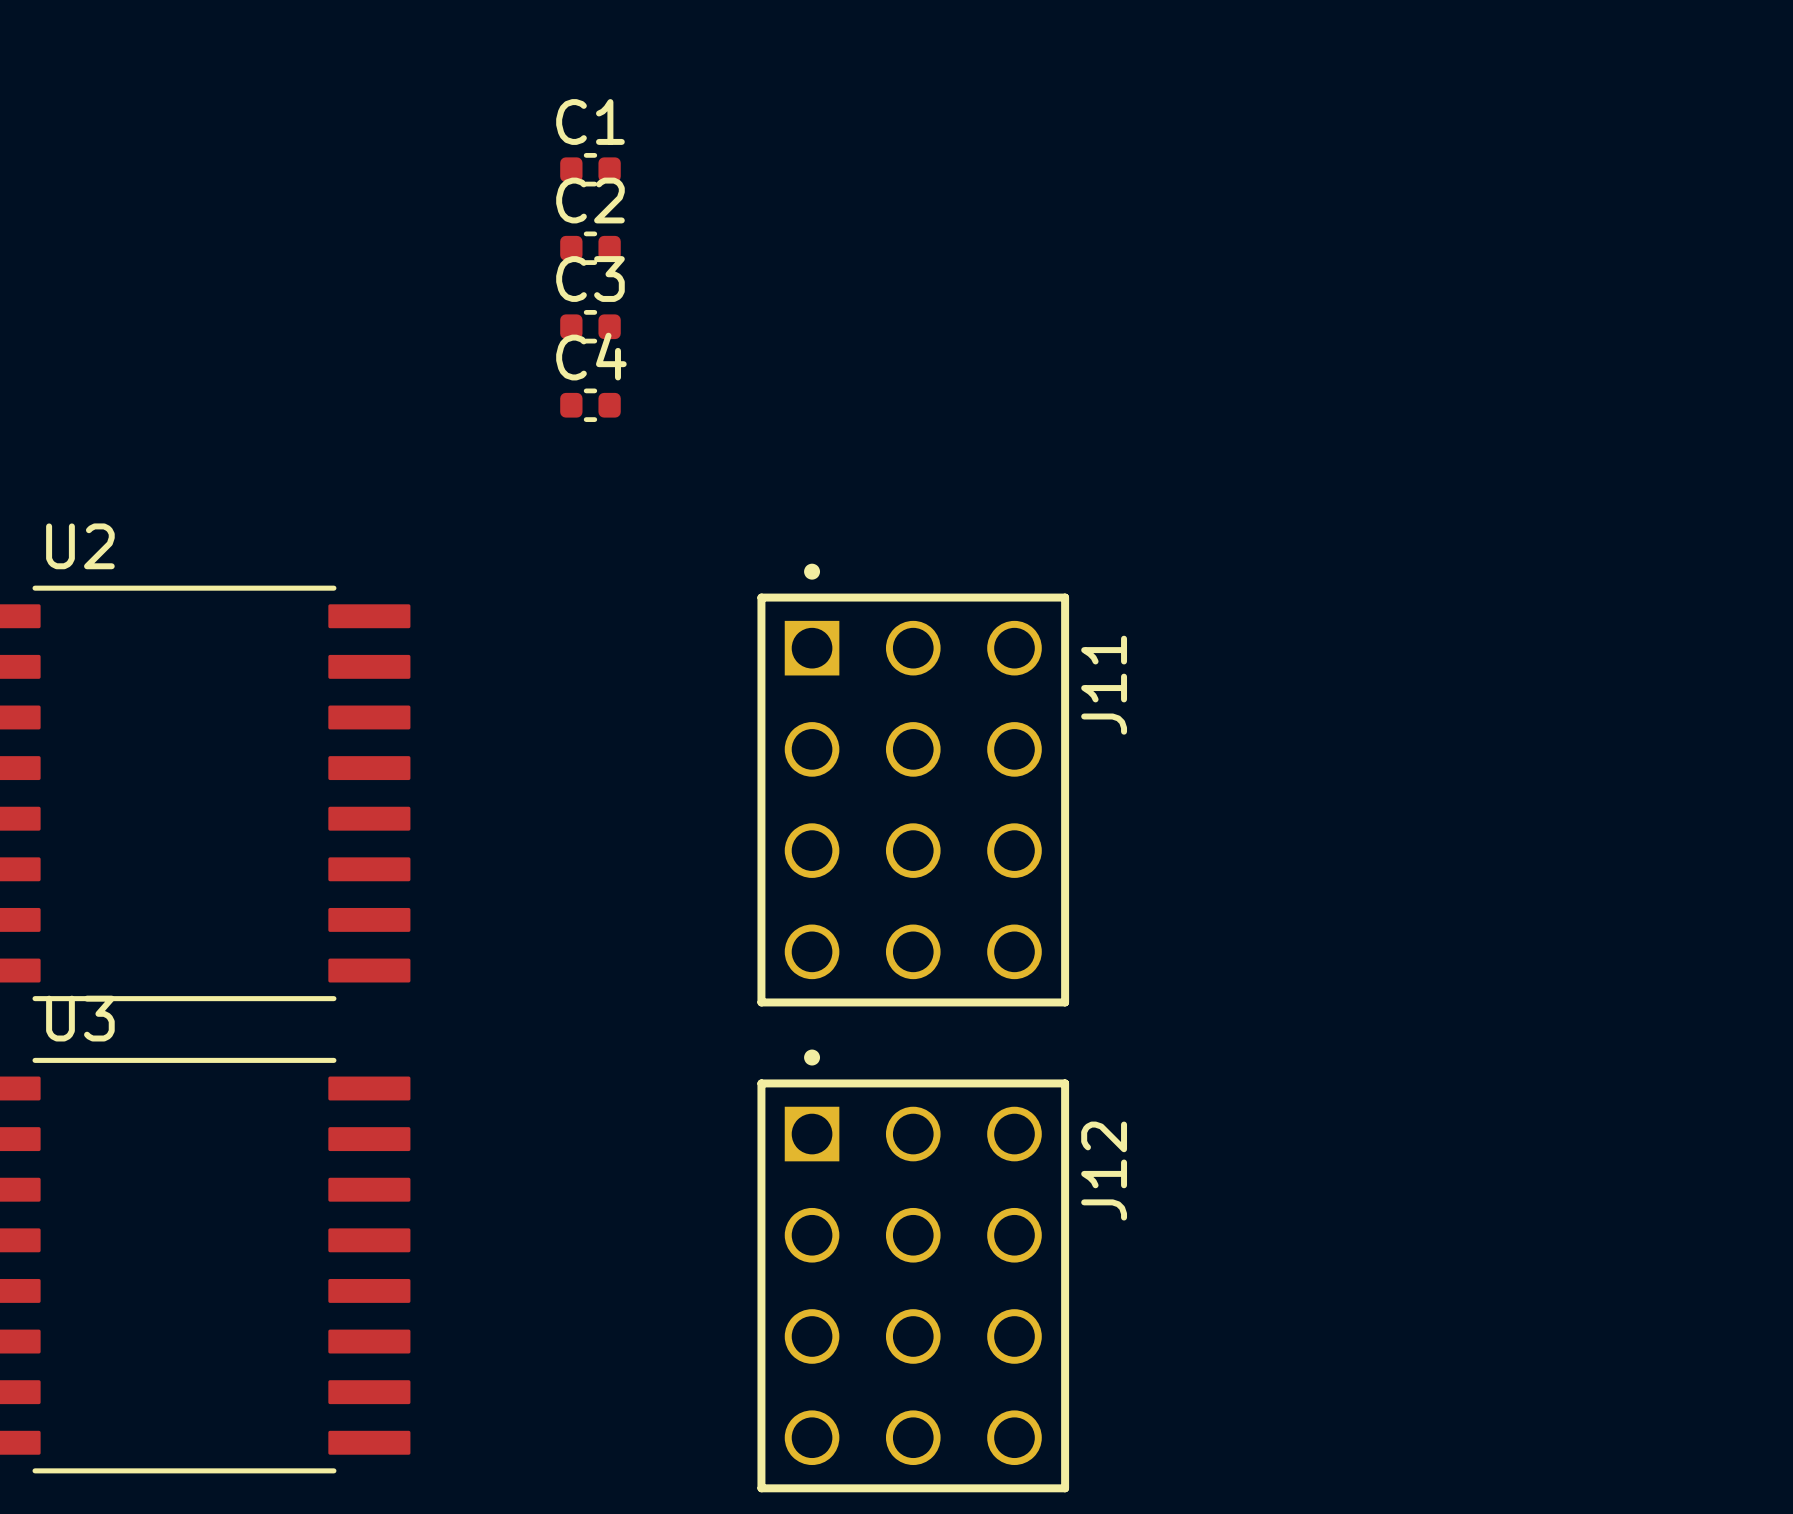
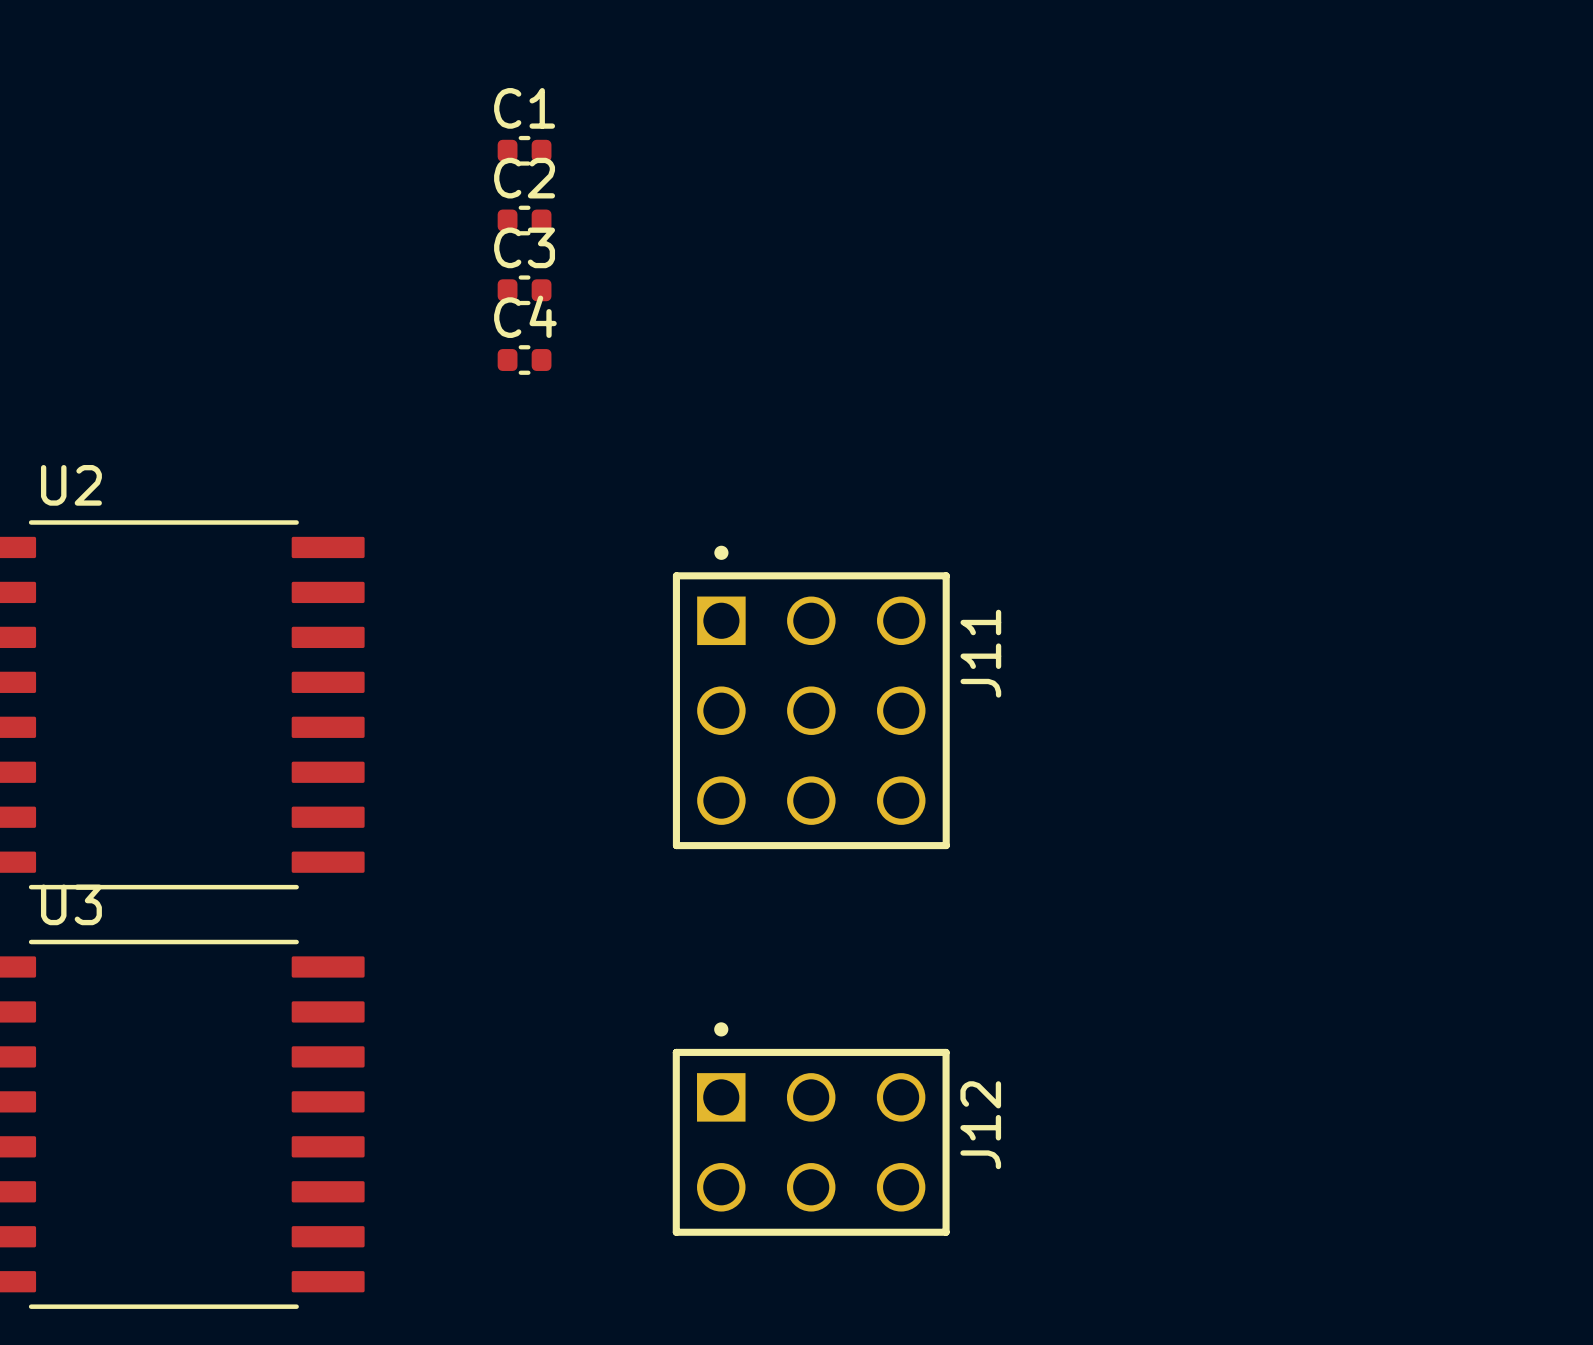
J11 footprint: [757, 563, 1070, 1007] -> [672, 545, 950, 850]
J12 footprint: [757, 1049, 1070, 1493] -> [672, 1022, 950, 1236]
J12 name position: J12 (1104, 1171) -> J12 (980, 1125)

